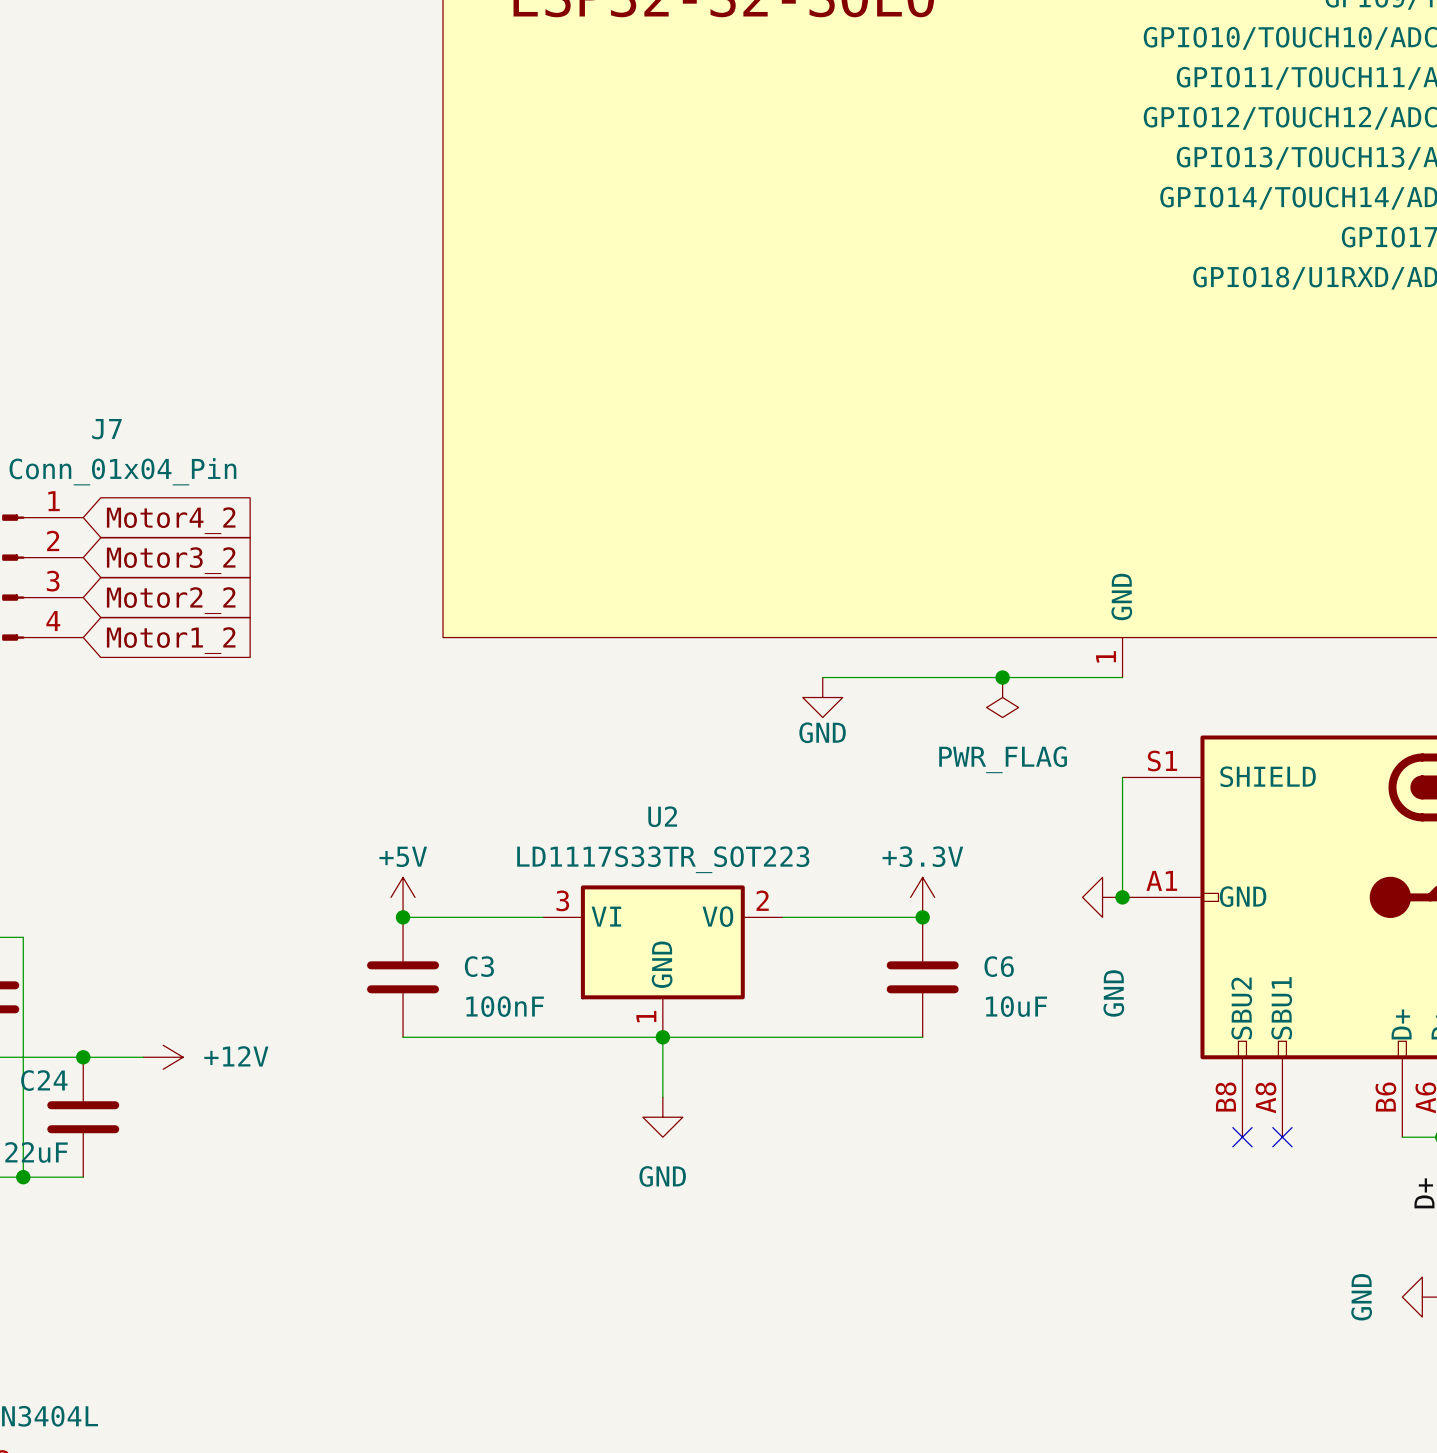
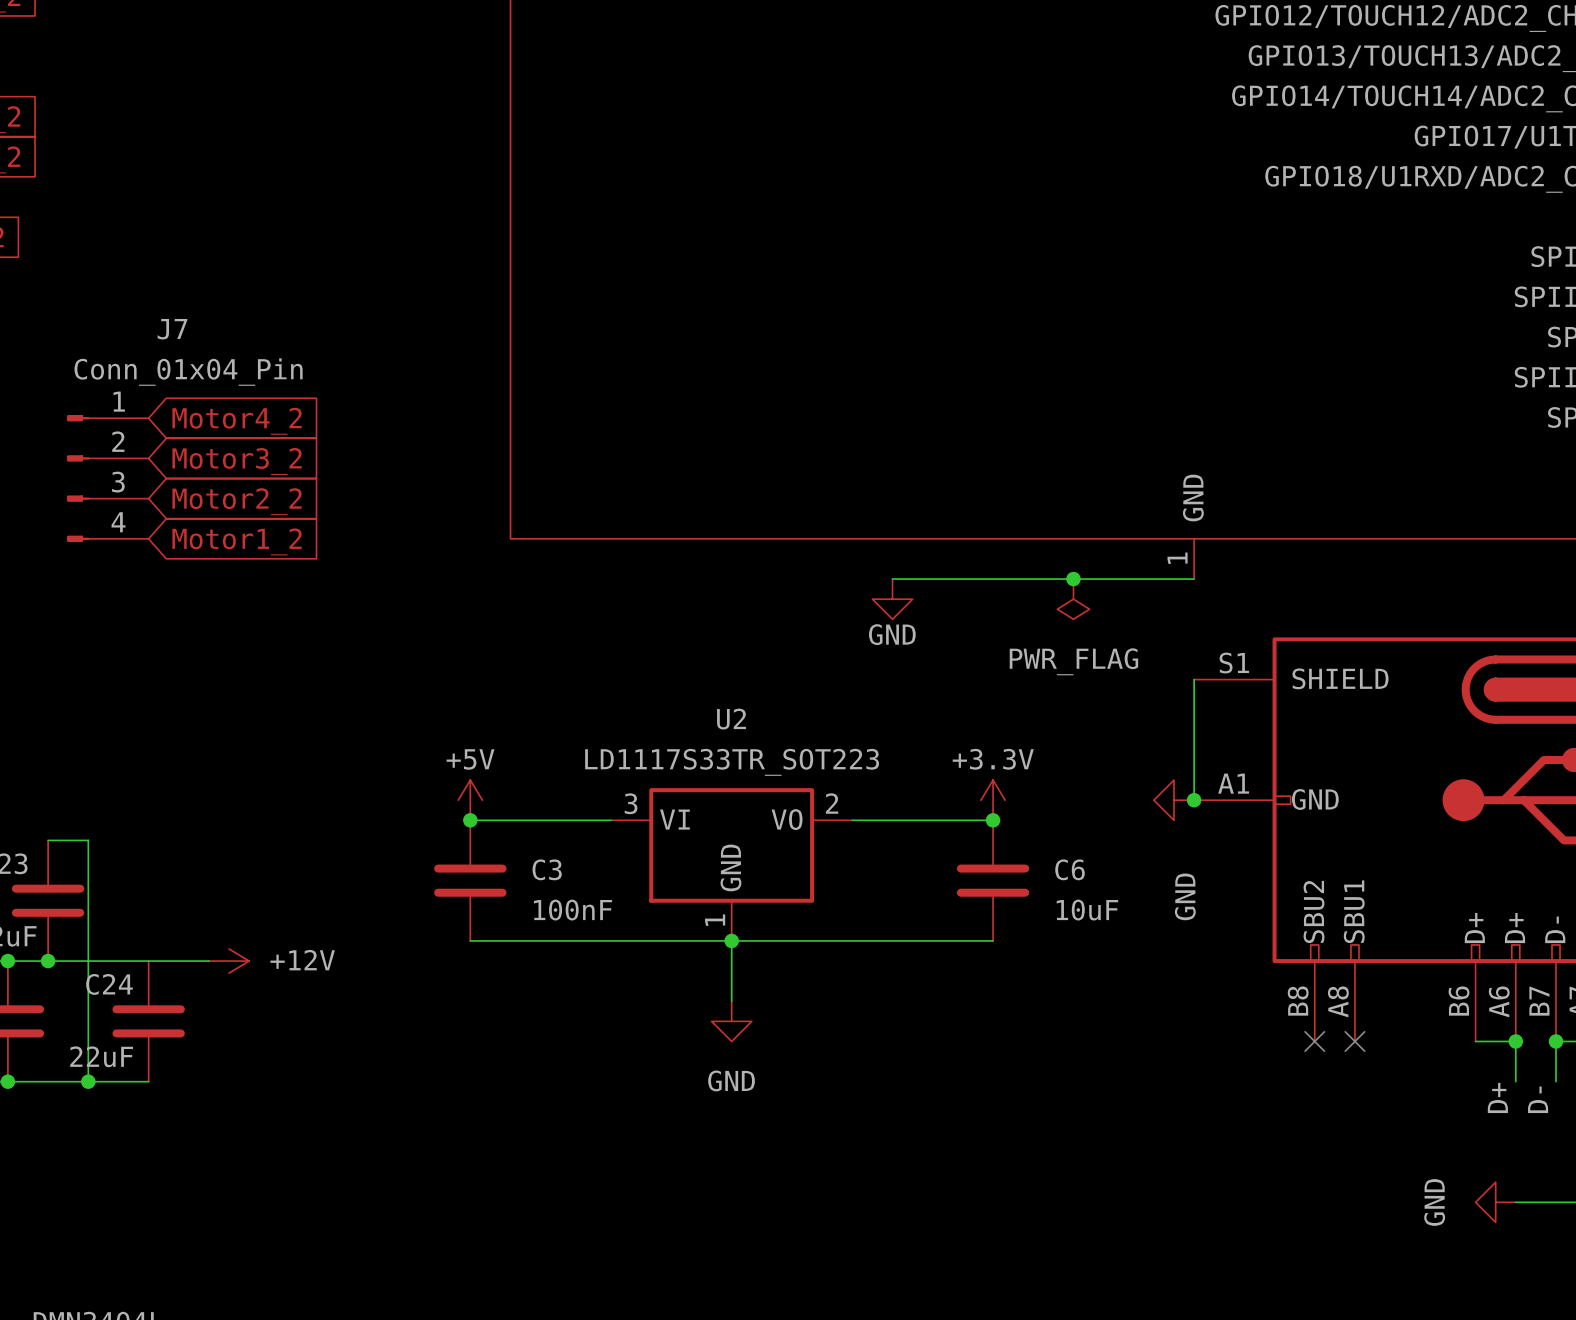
junction: (83, 1057) -> none

